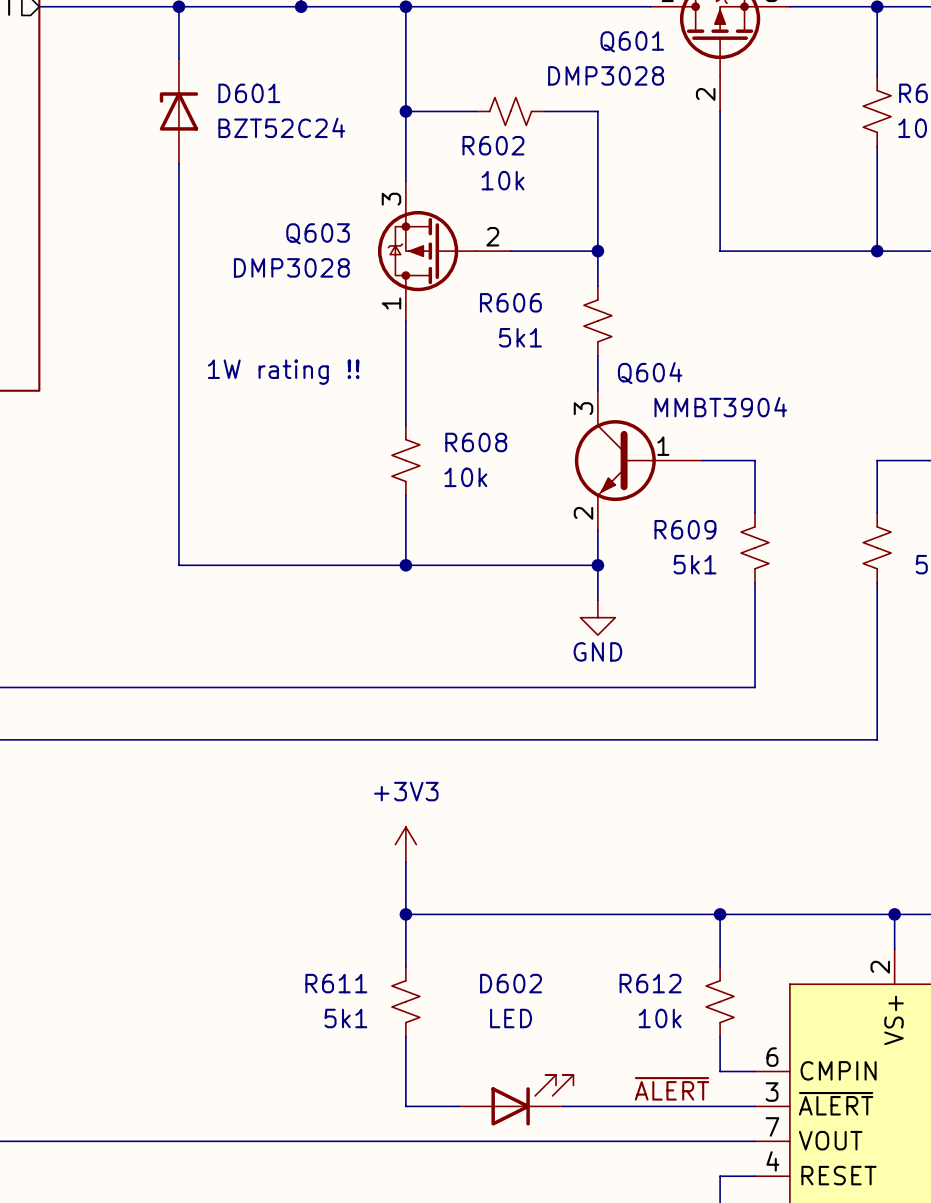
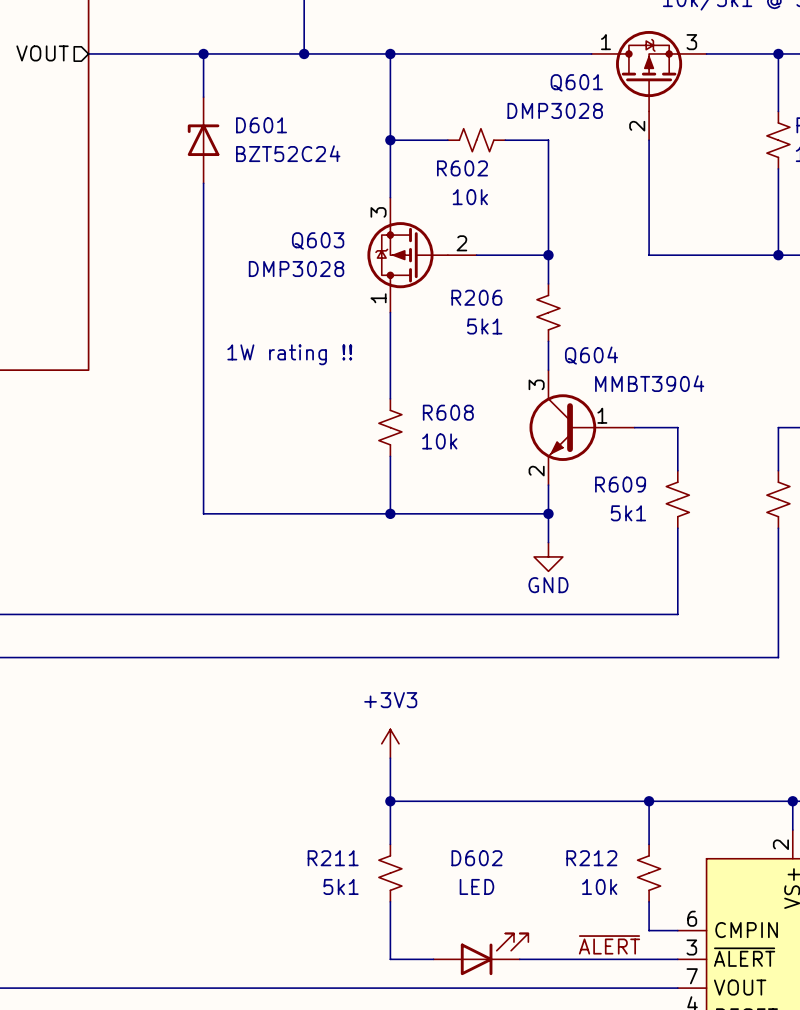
R606 name: R606 (510, 302) -> R206 (476, 297)
R611 name: R611 (336, 983) -> R211 (333, 858)
R612 name: R612 (650, 983) -> R212 (591, 858)

